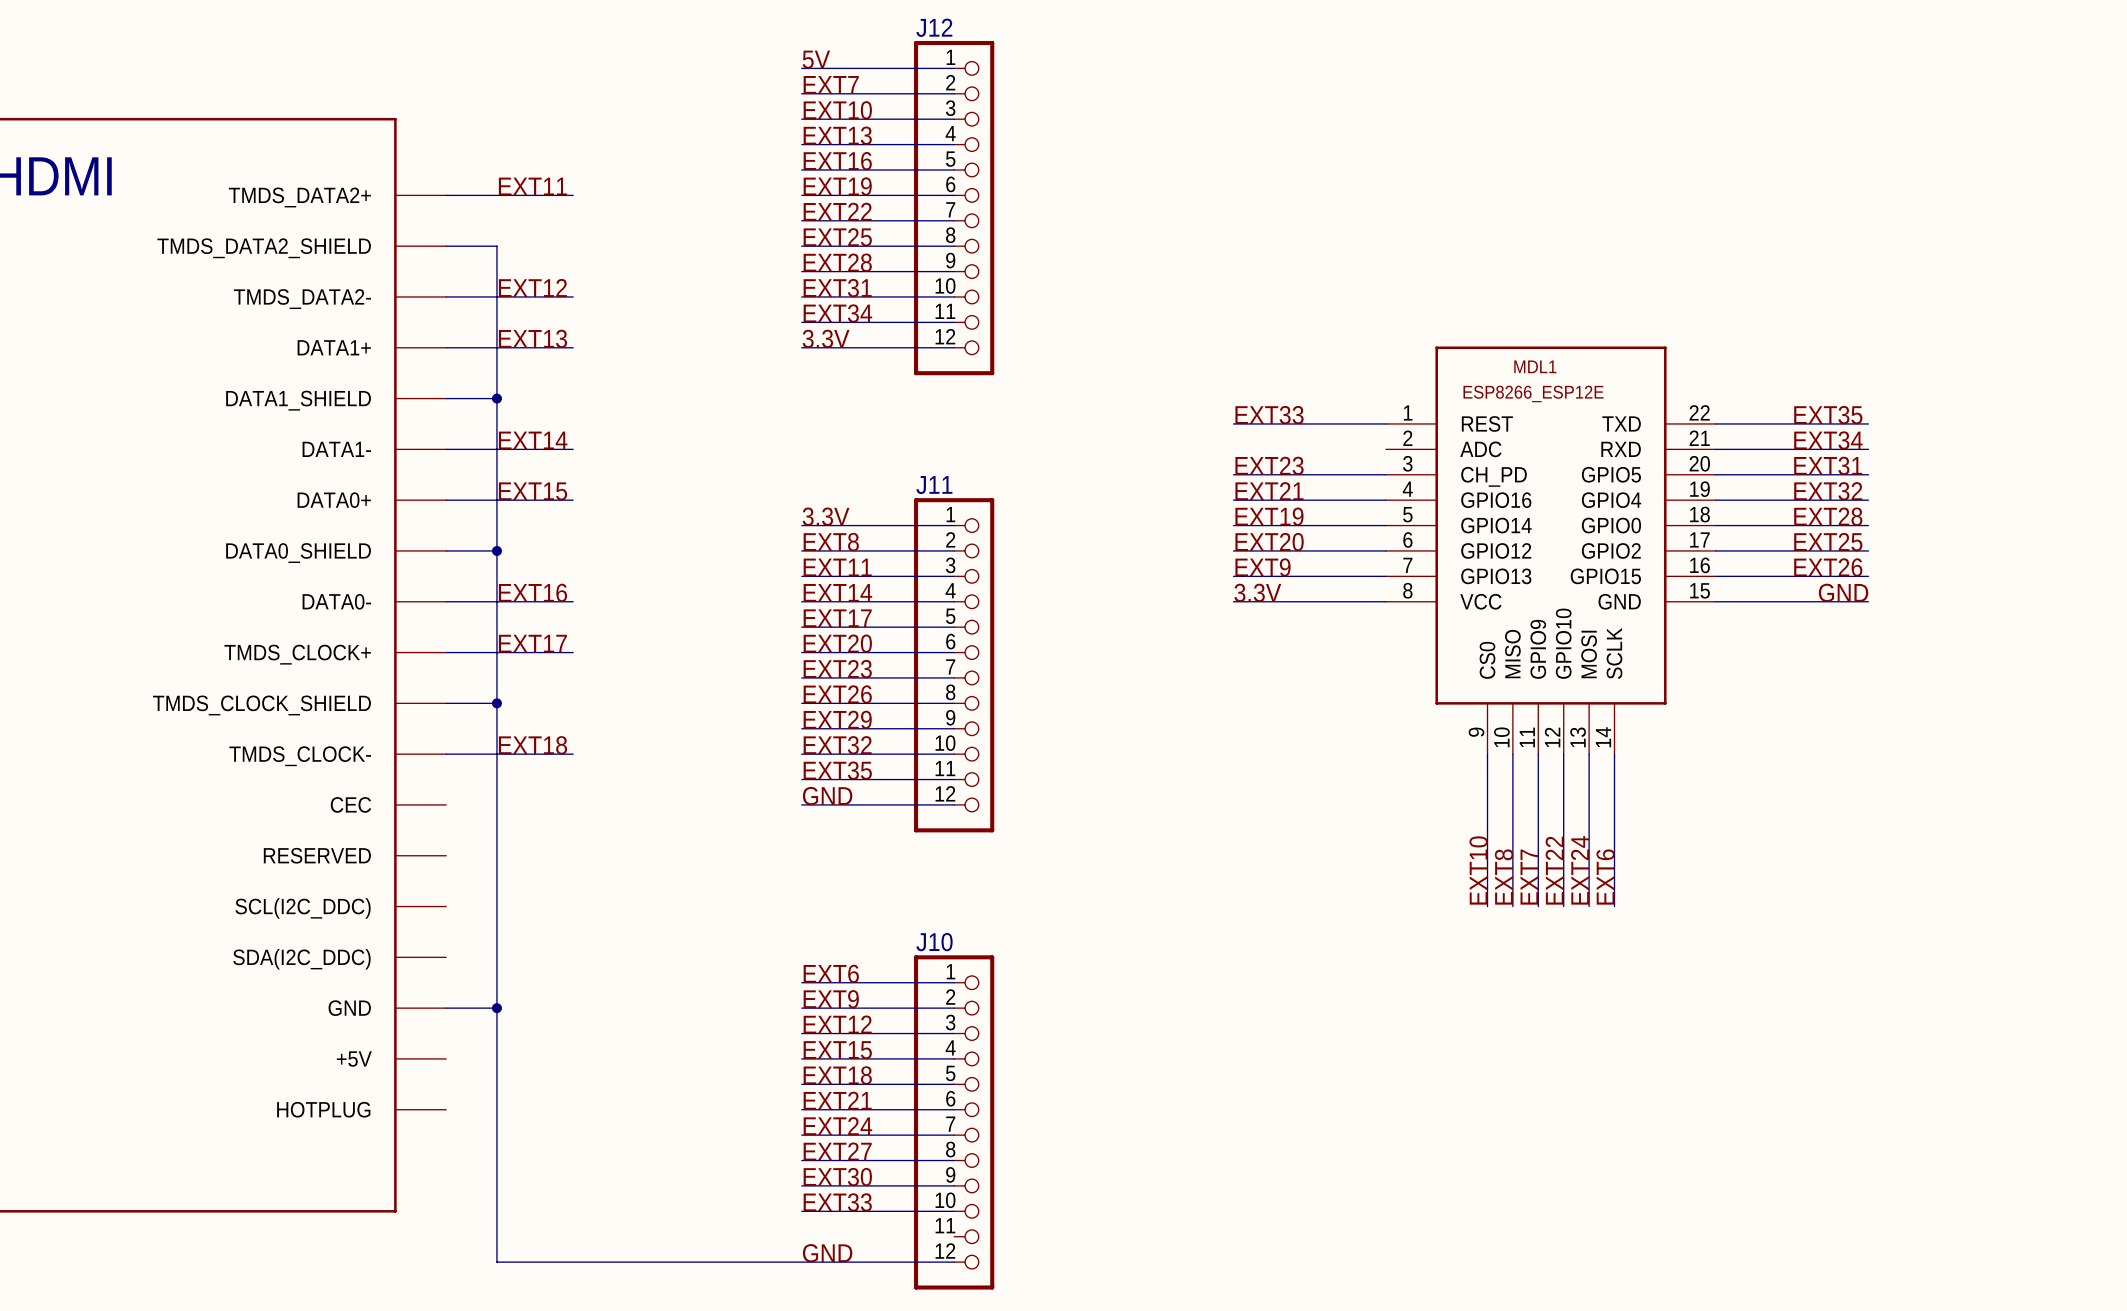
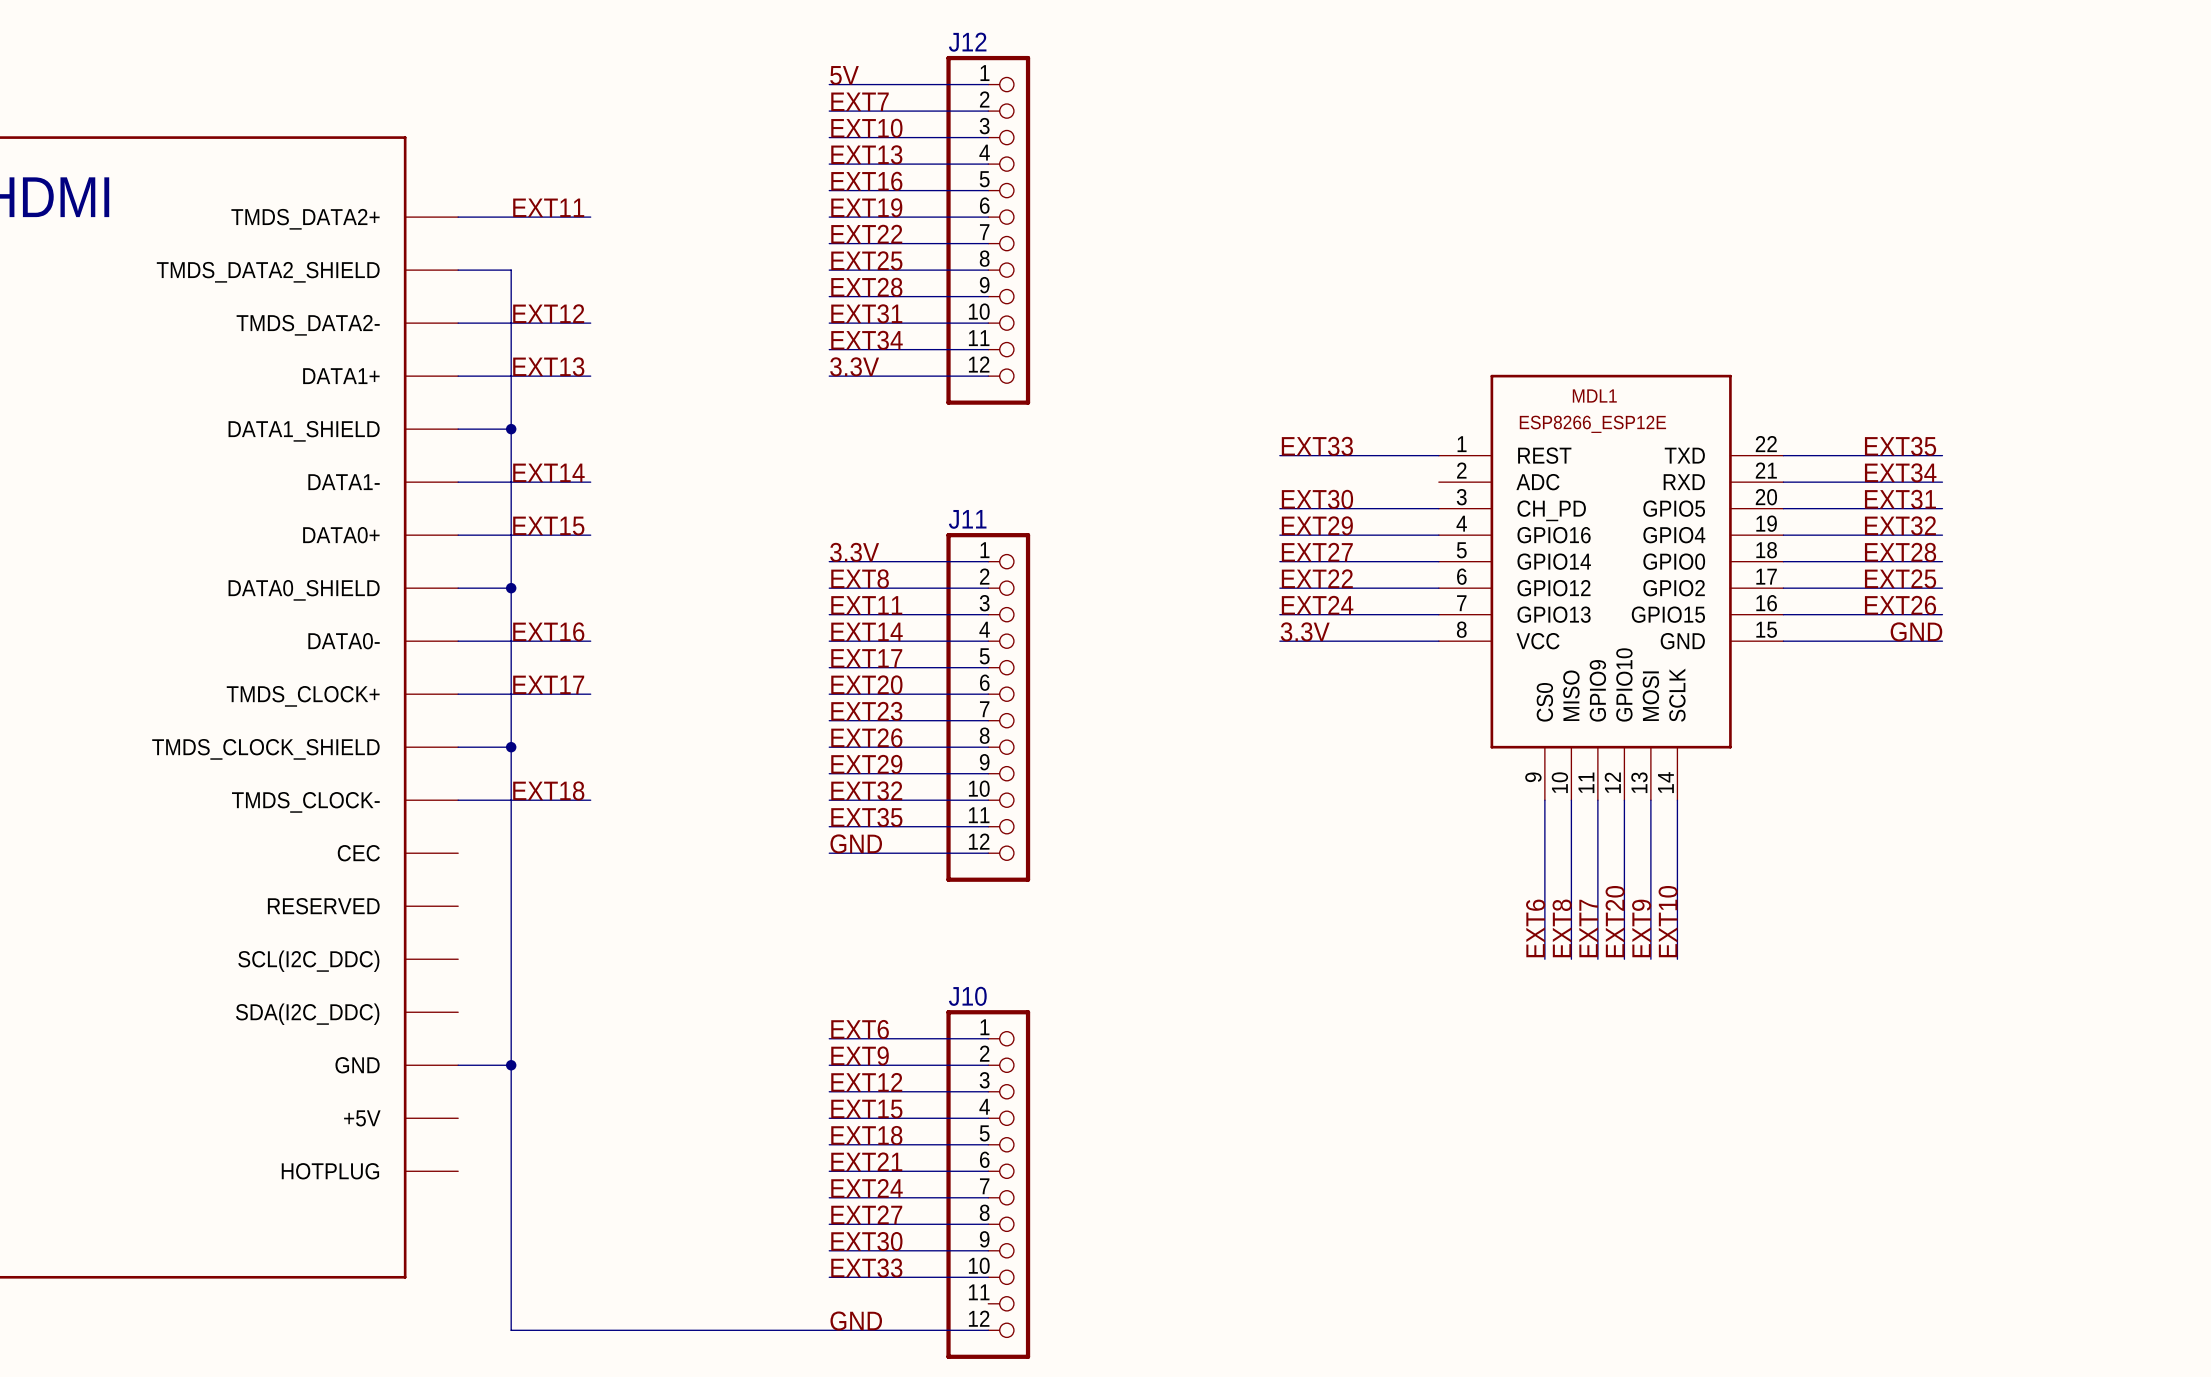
label: EXT23 (1269, 465) -> EXT30 (1317, 499)
label: EXT21 (1269, 491) -> EXT29 (1317, 525)
label: EXT19 (1269, 516) -> EXT27 (1317, 552)
label: EXT20 (1269, 542) -> EXT22 (1317, 578)
label: EXT9 (1263, 567) -> EXT24 (1317, 605)
label: EXT10 (1478, 870) -> EXT6 (1535, 928)
label: EXT22 (1554, 870) -> EXT20 (1615, 921)
label: EXT24 (1580, 870) -> EXT9 (1641, 928)
label: EXT6 (1605, 877) -> EXT10 (1668, 921)

